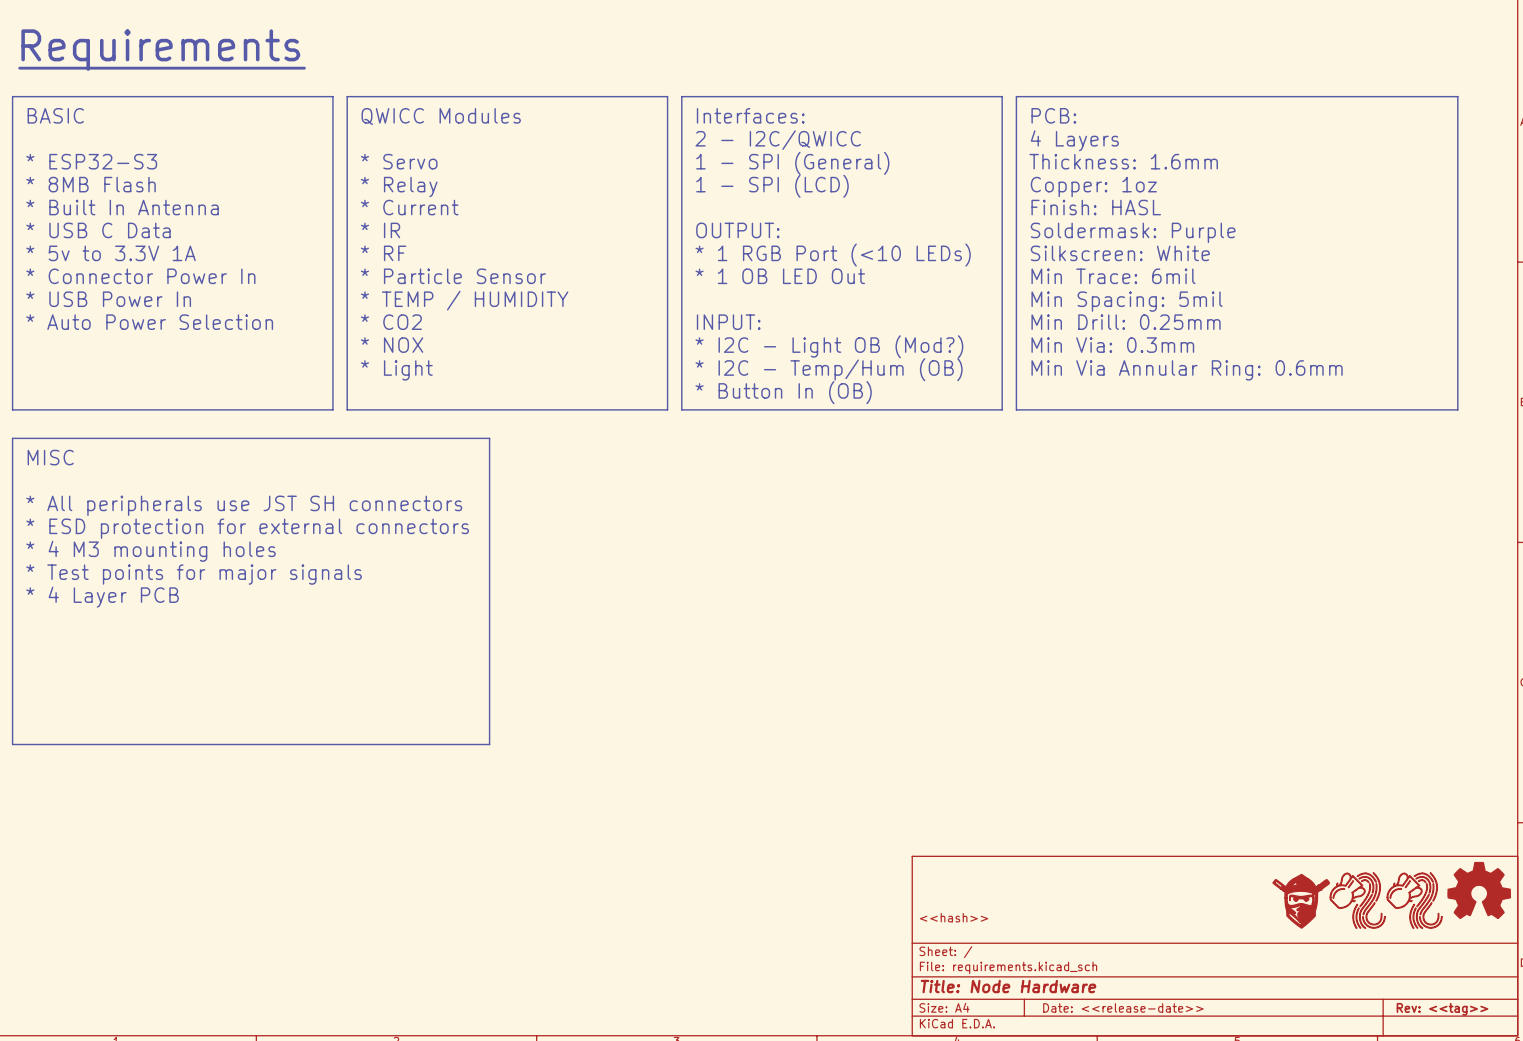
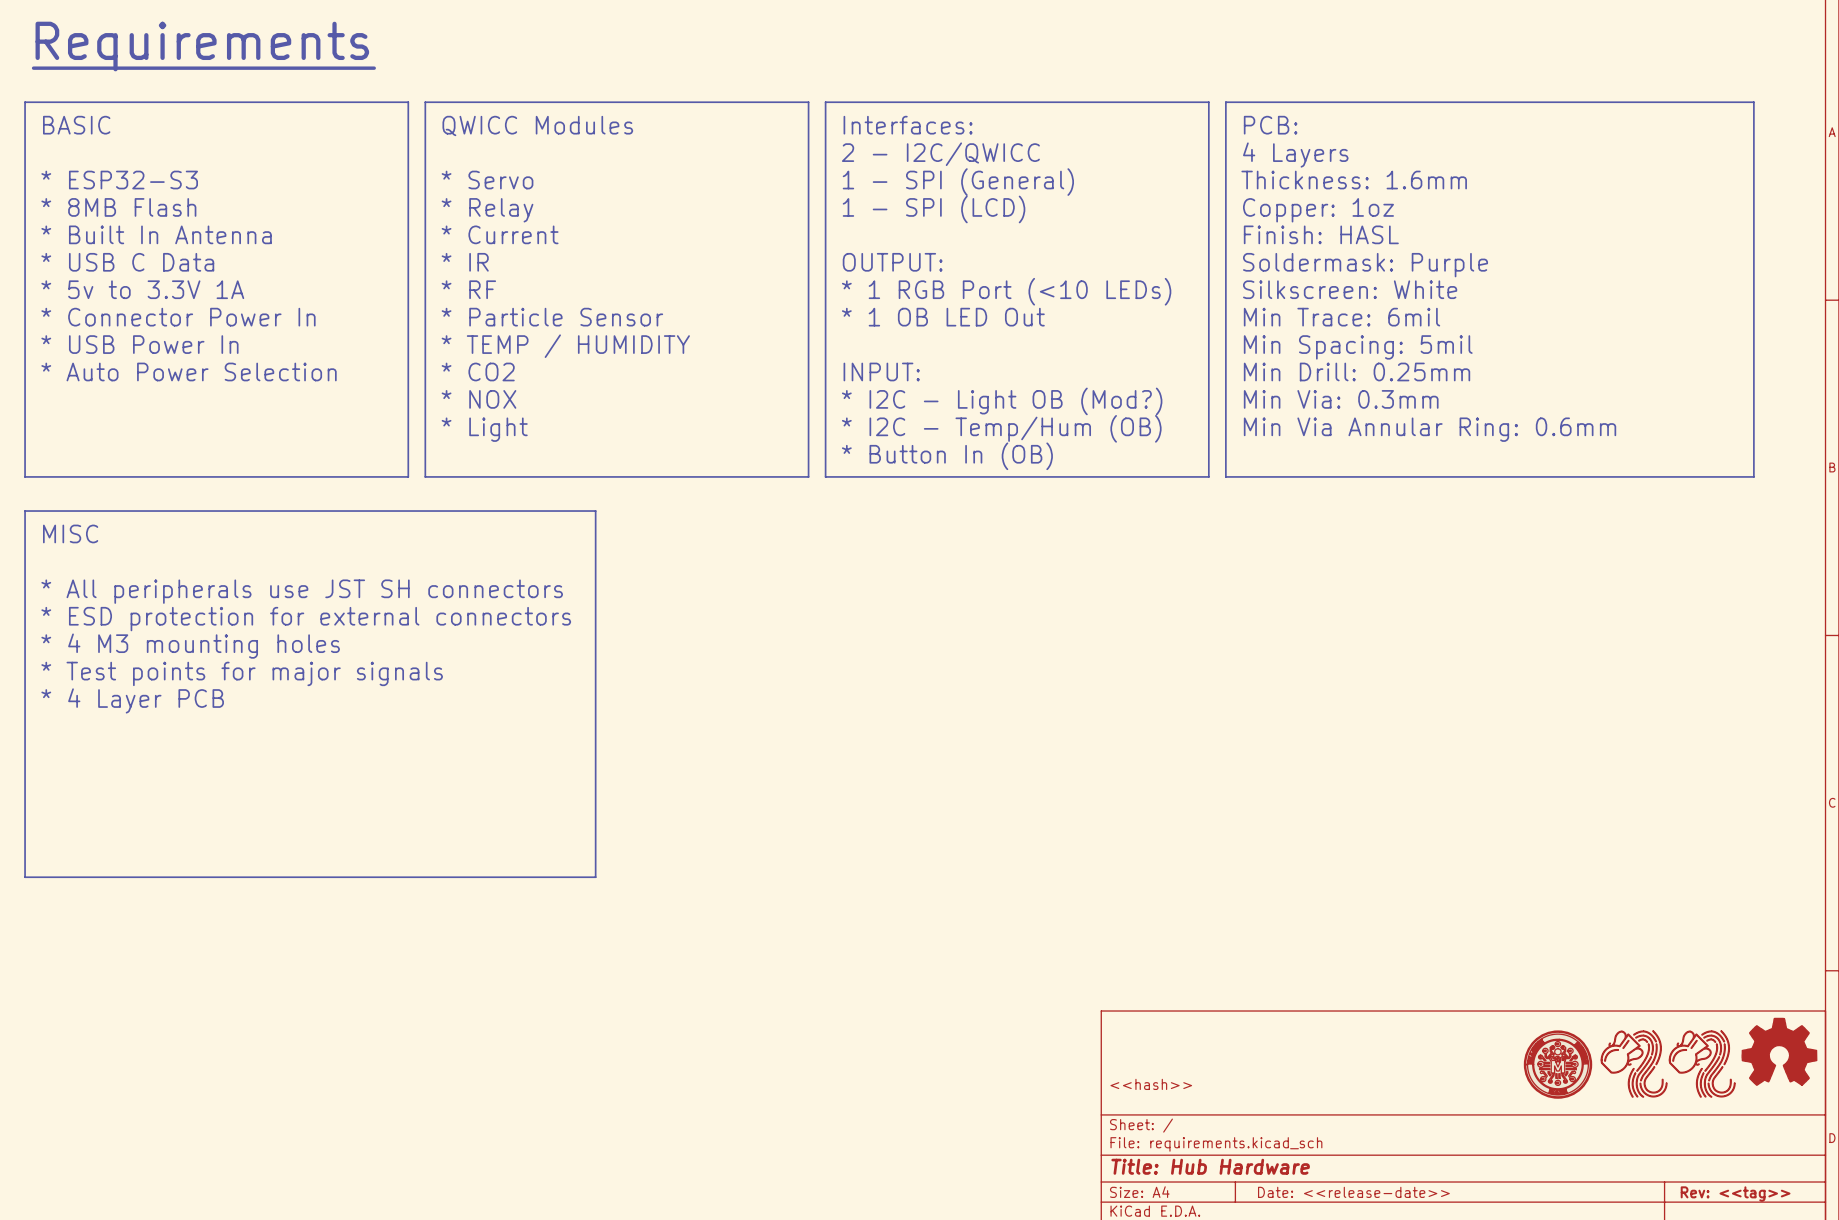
part: none -> (1558, 1064)
part: (1301, 901) -> none
title block: Title: Node Hardware (1008, 986) -> Title: Hub Hardware (1210, 1166)

